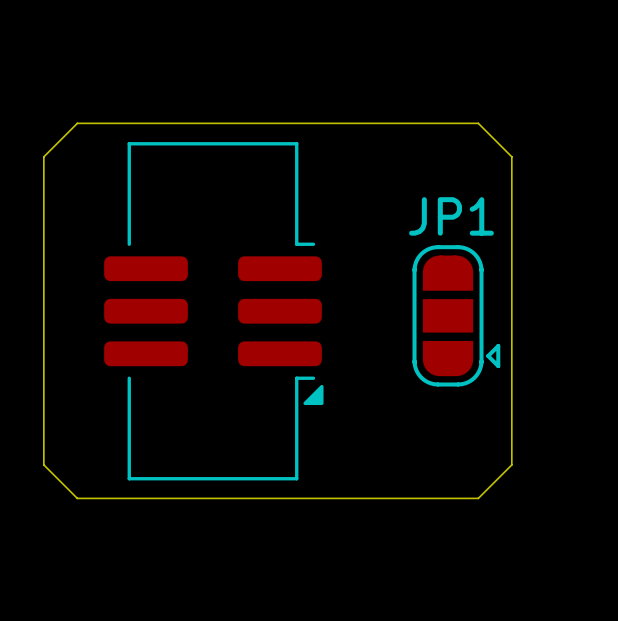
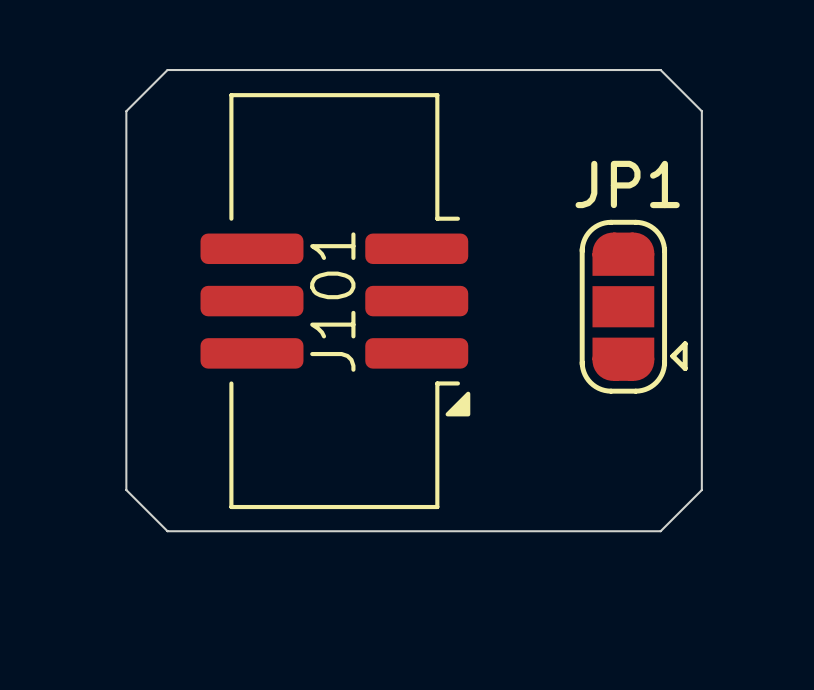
J101 name: none -> J101 (332, 302)

